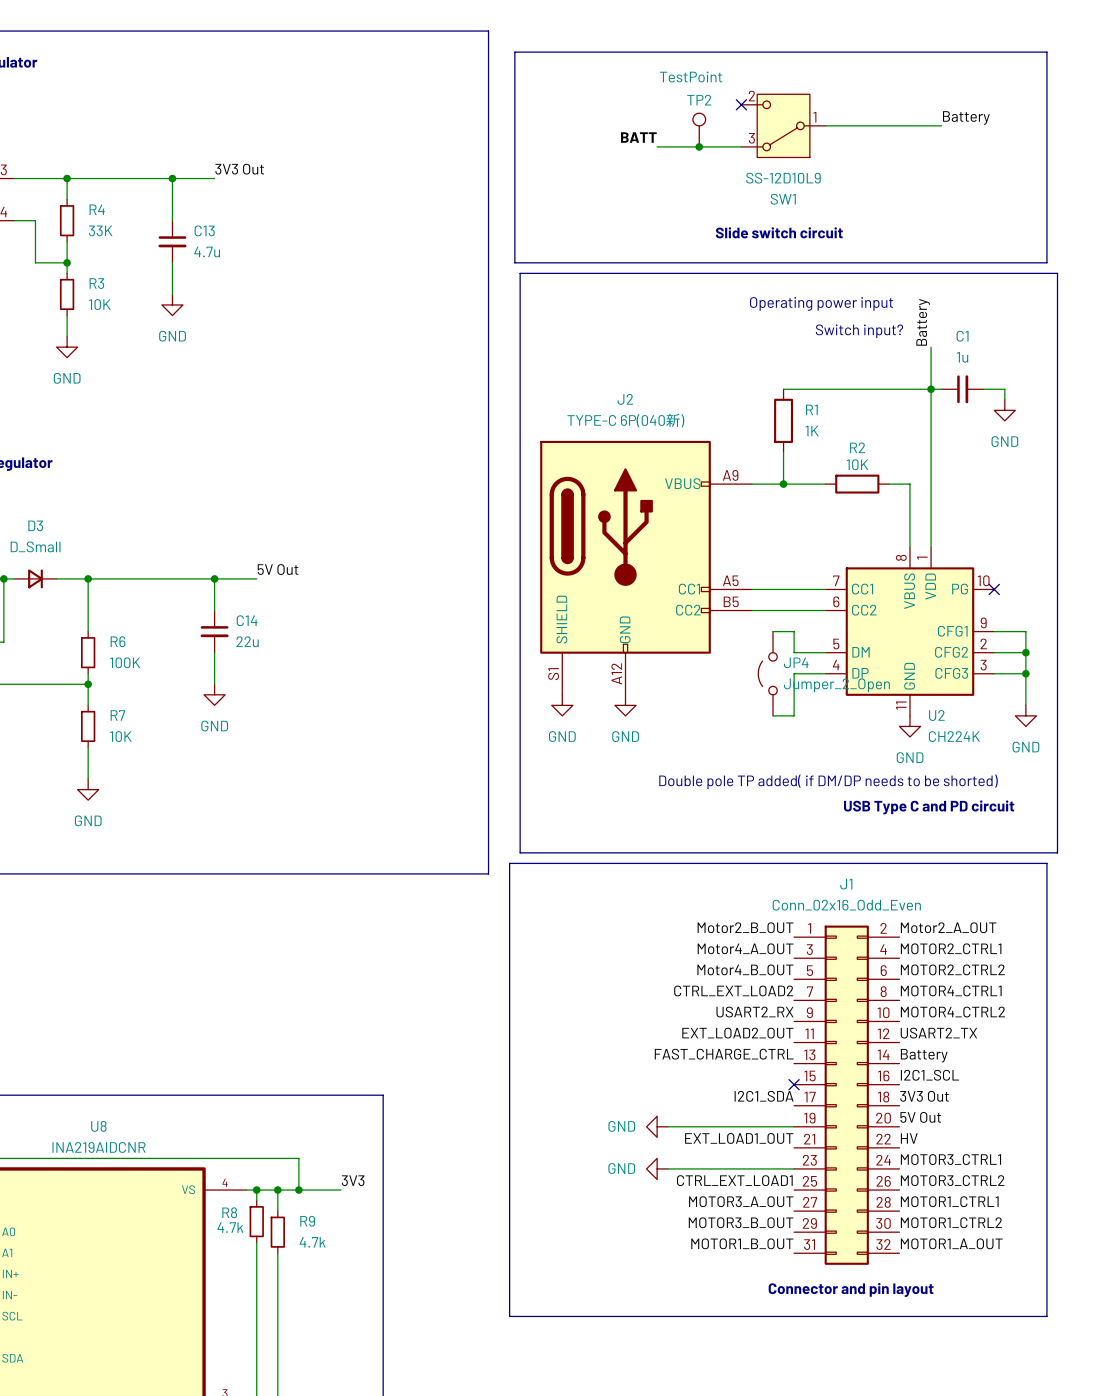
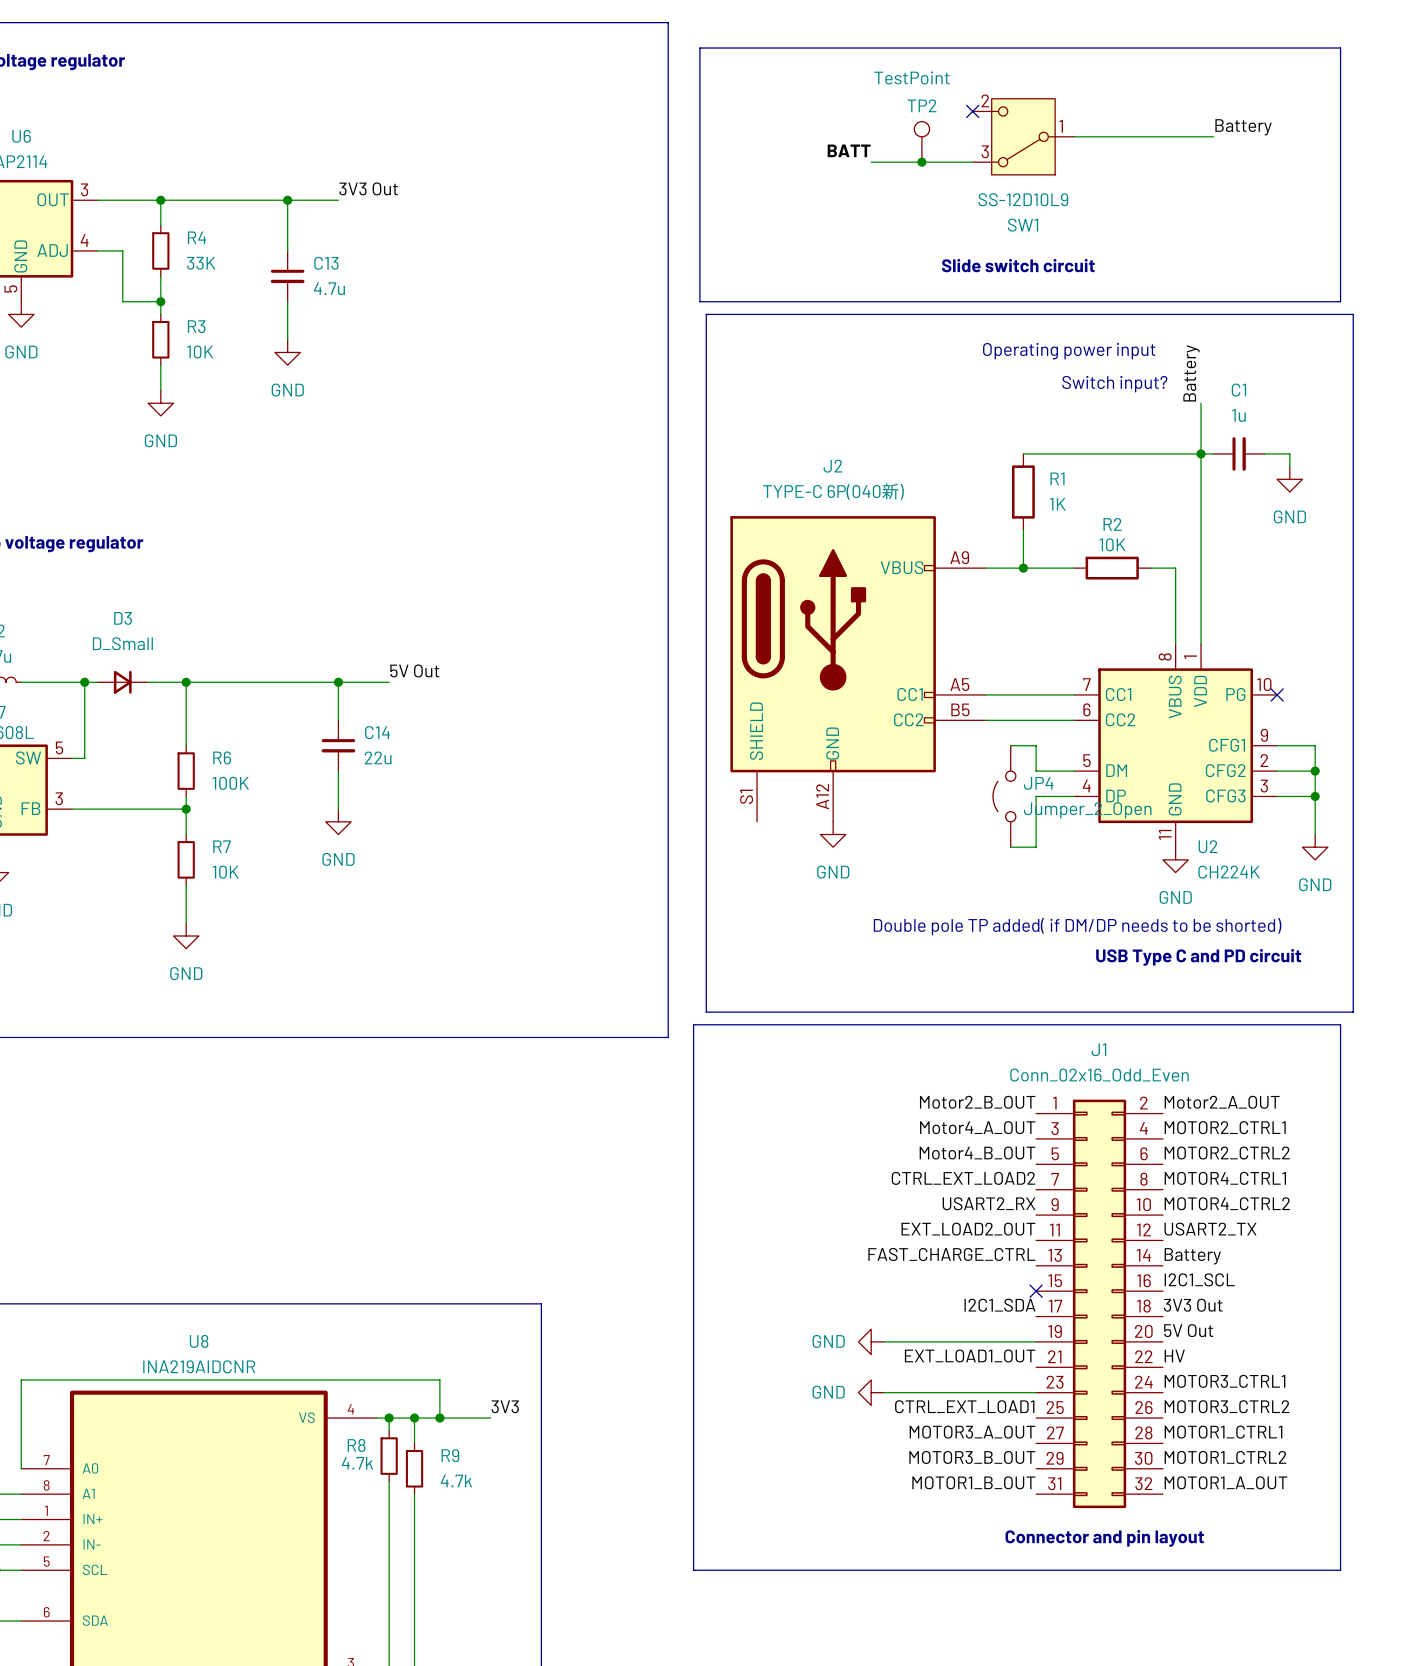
power symbol: GND (562, 705) -> none

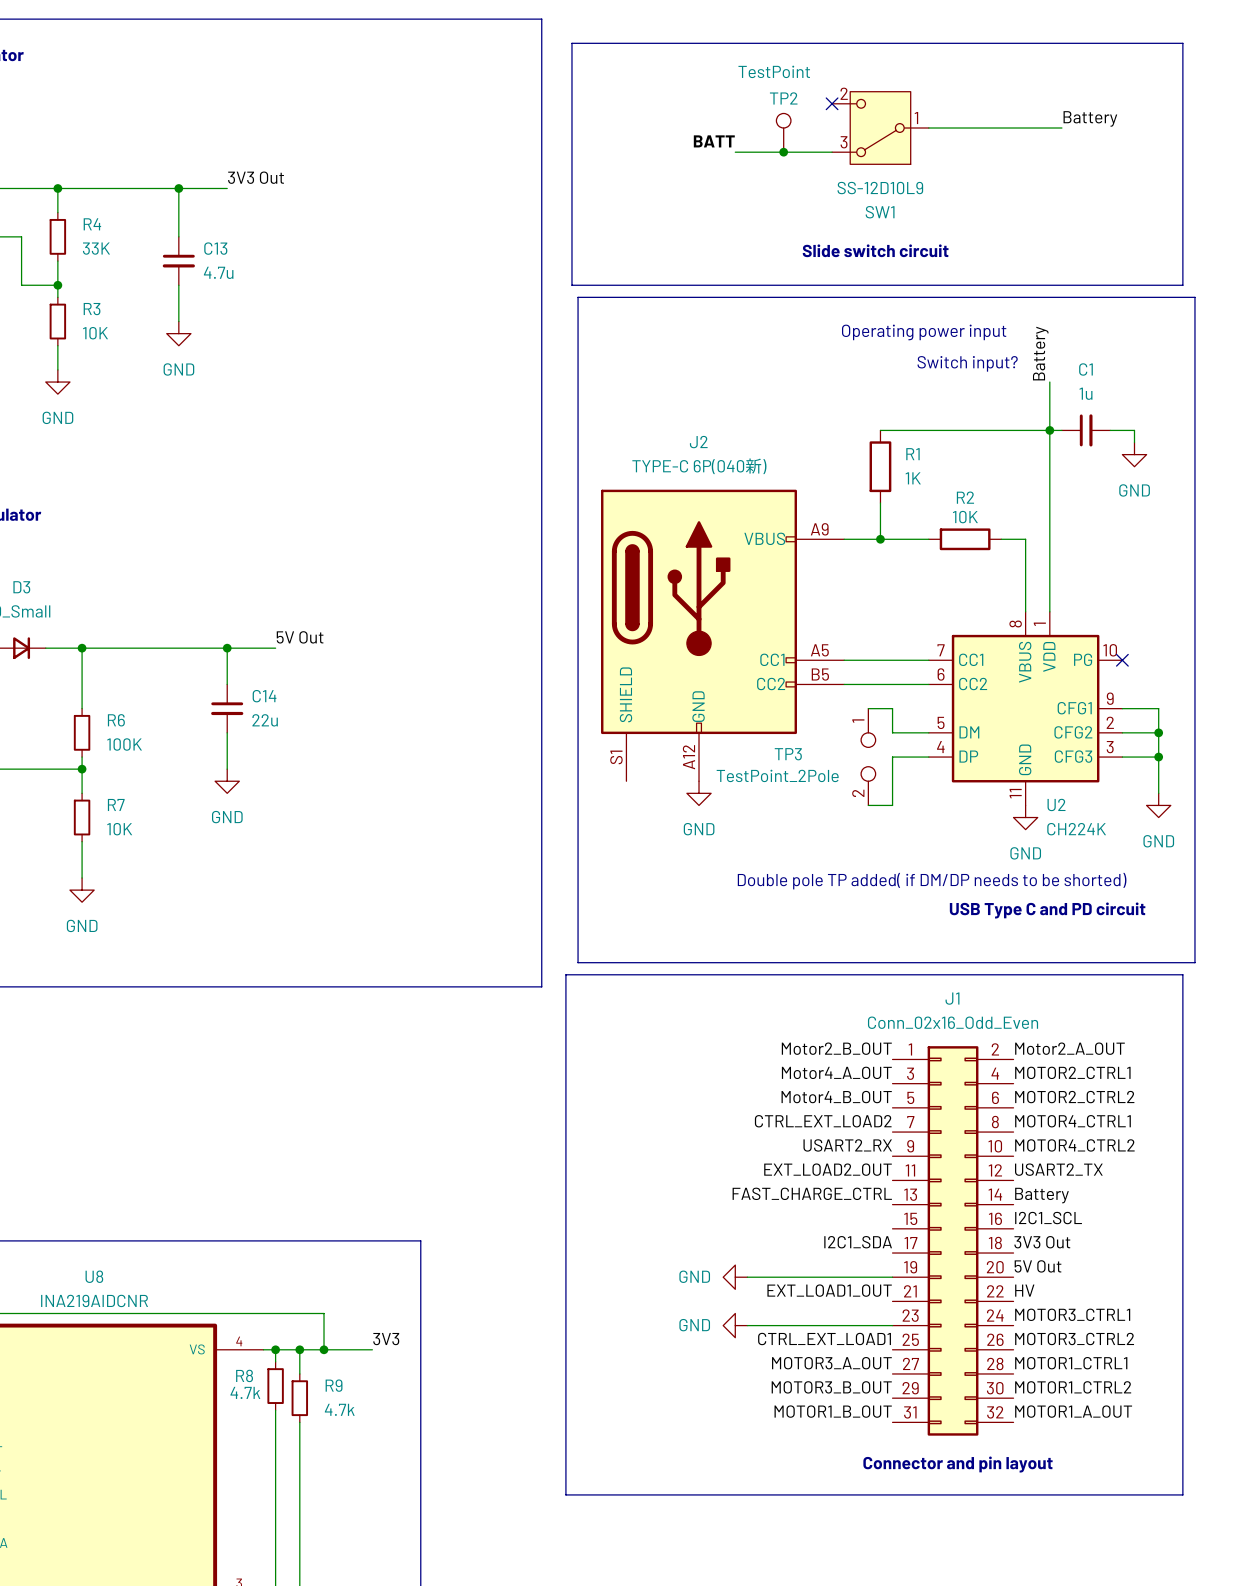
JP4: Jumper_2_Open (1004, 796) -> none
TP3: none -> TestPoint_2Pole (868, 757)
no-connect mark: (1036, 1291) -> none

